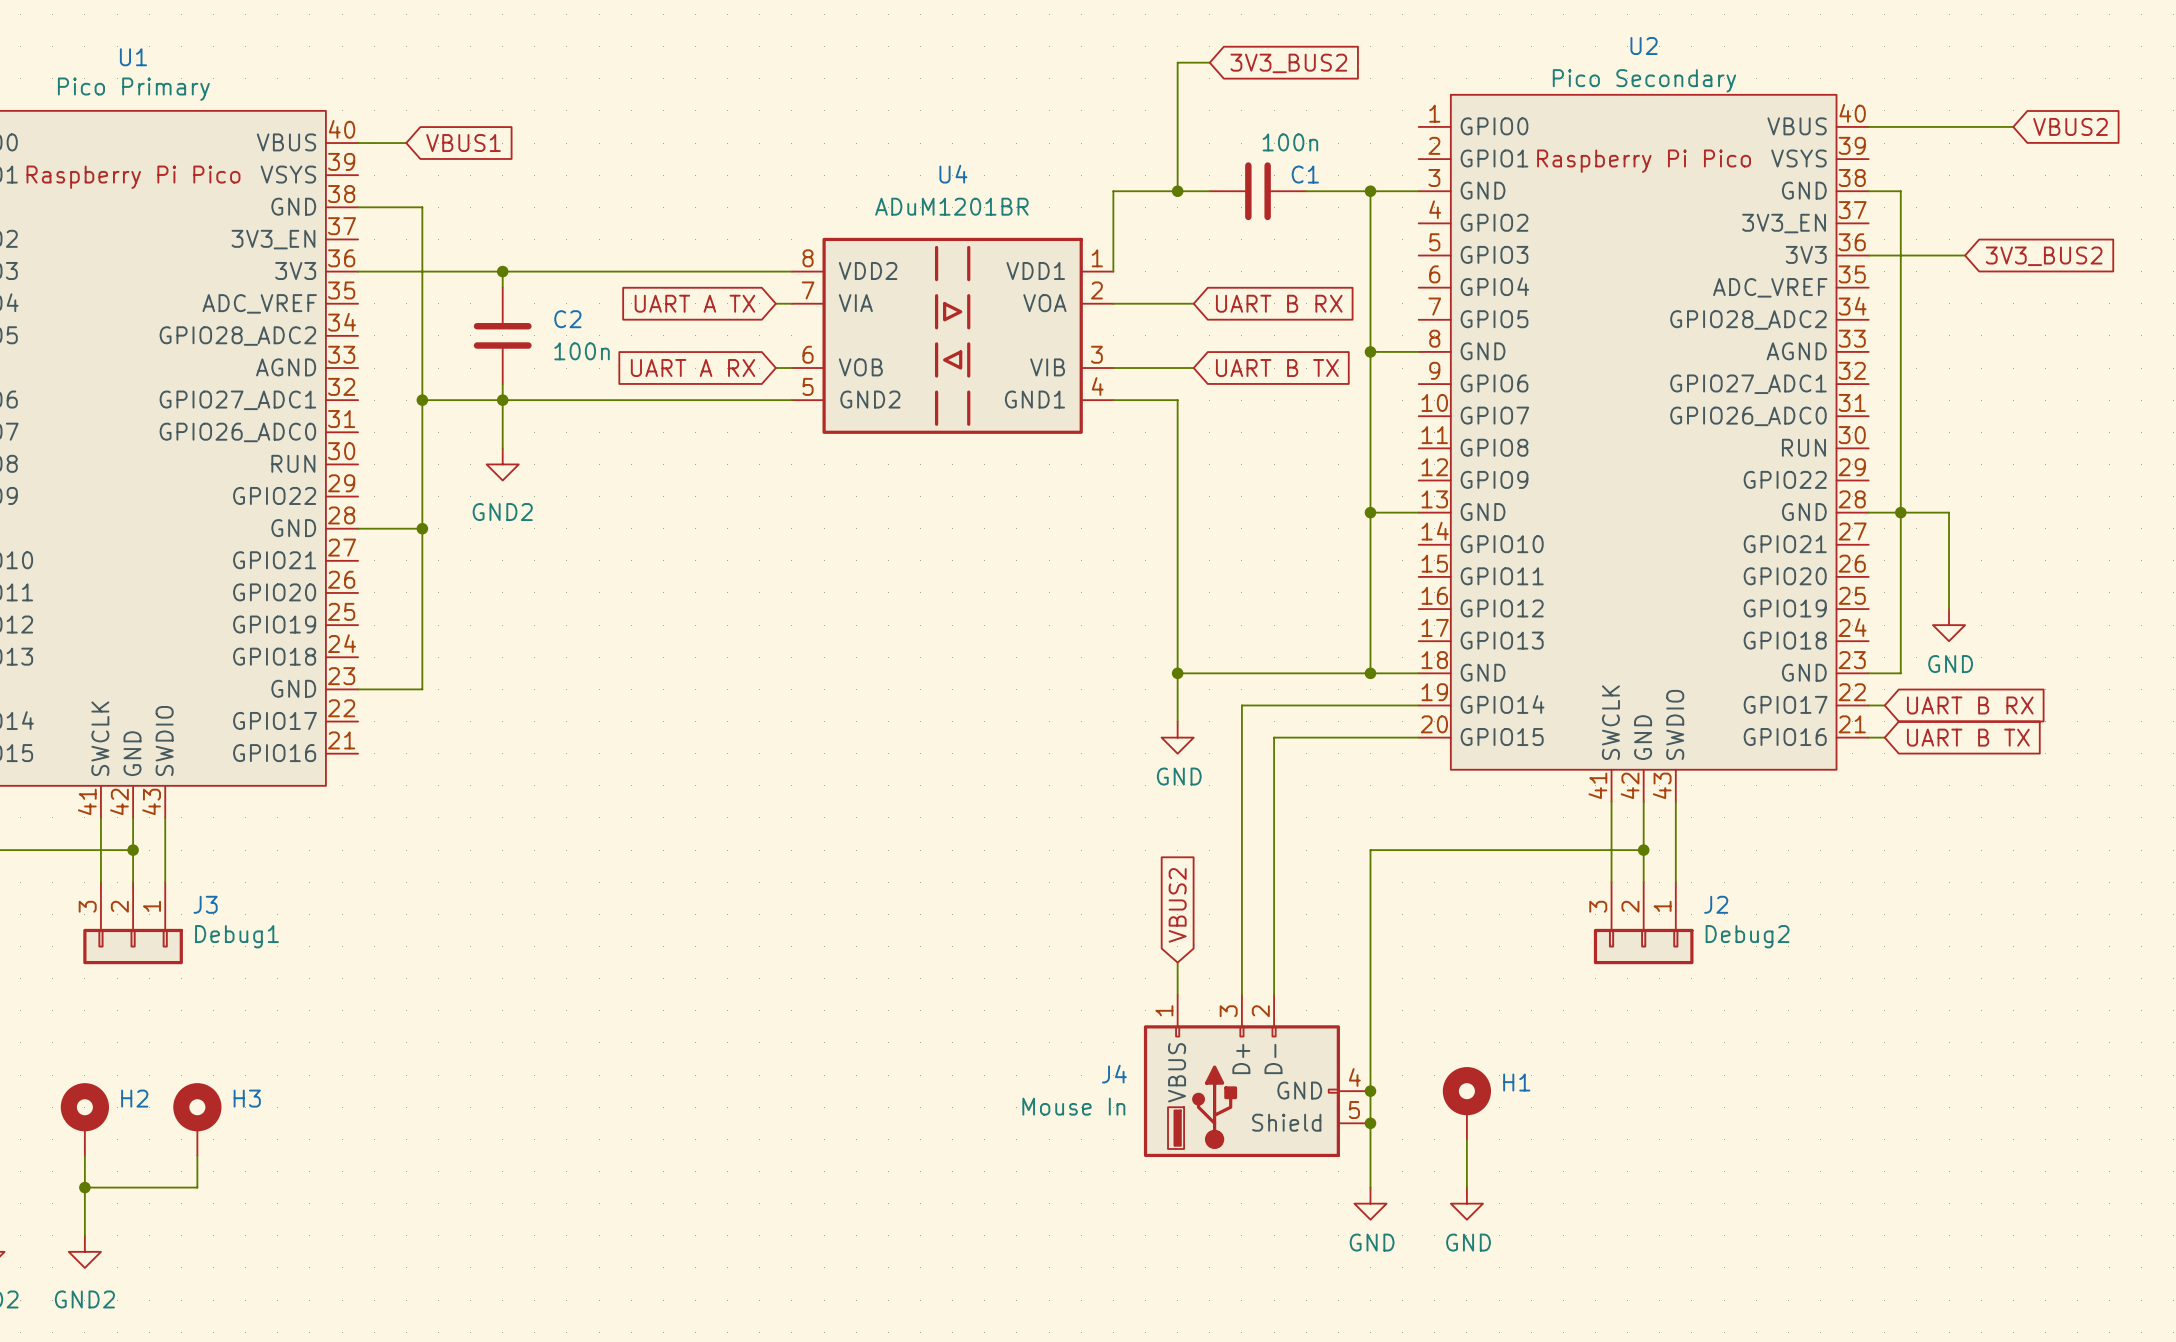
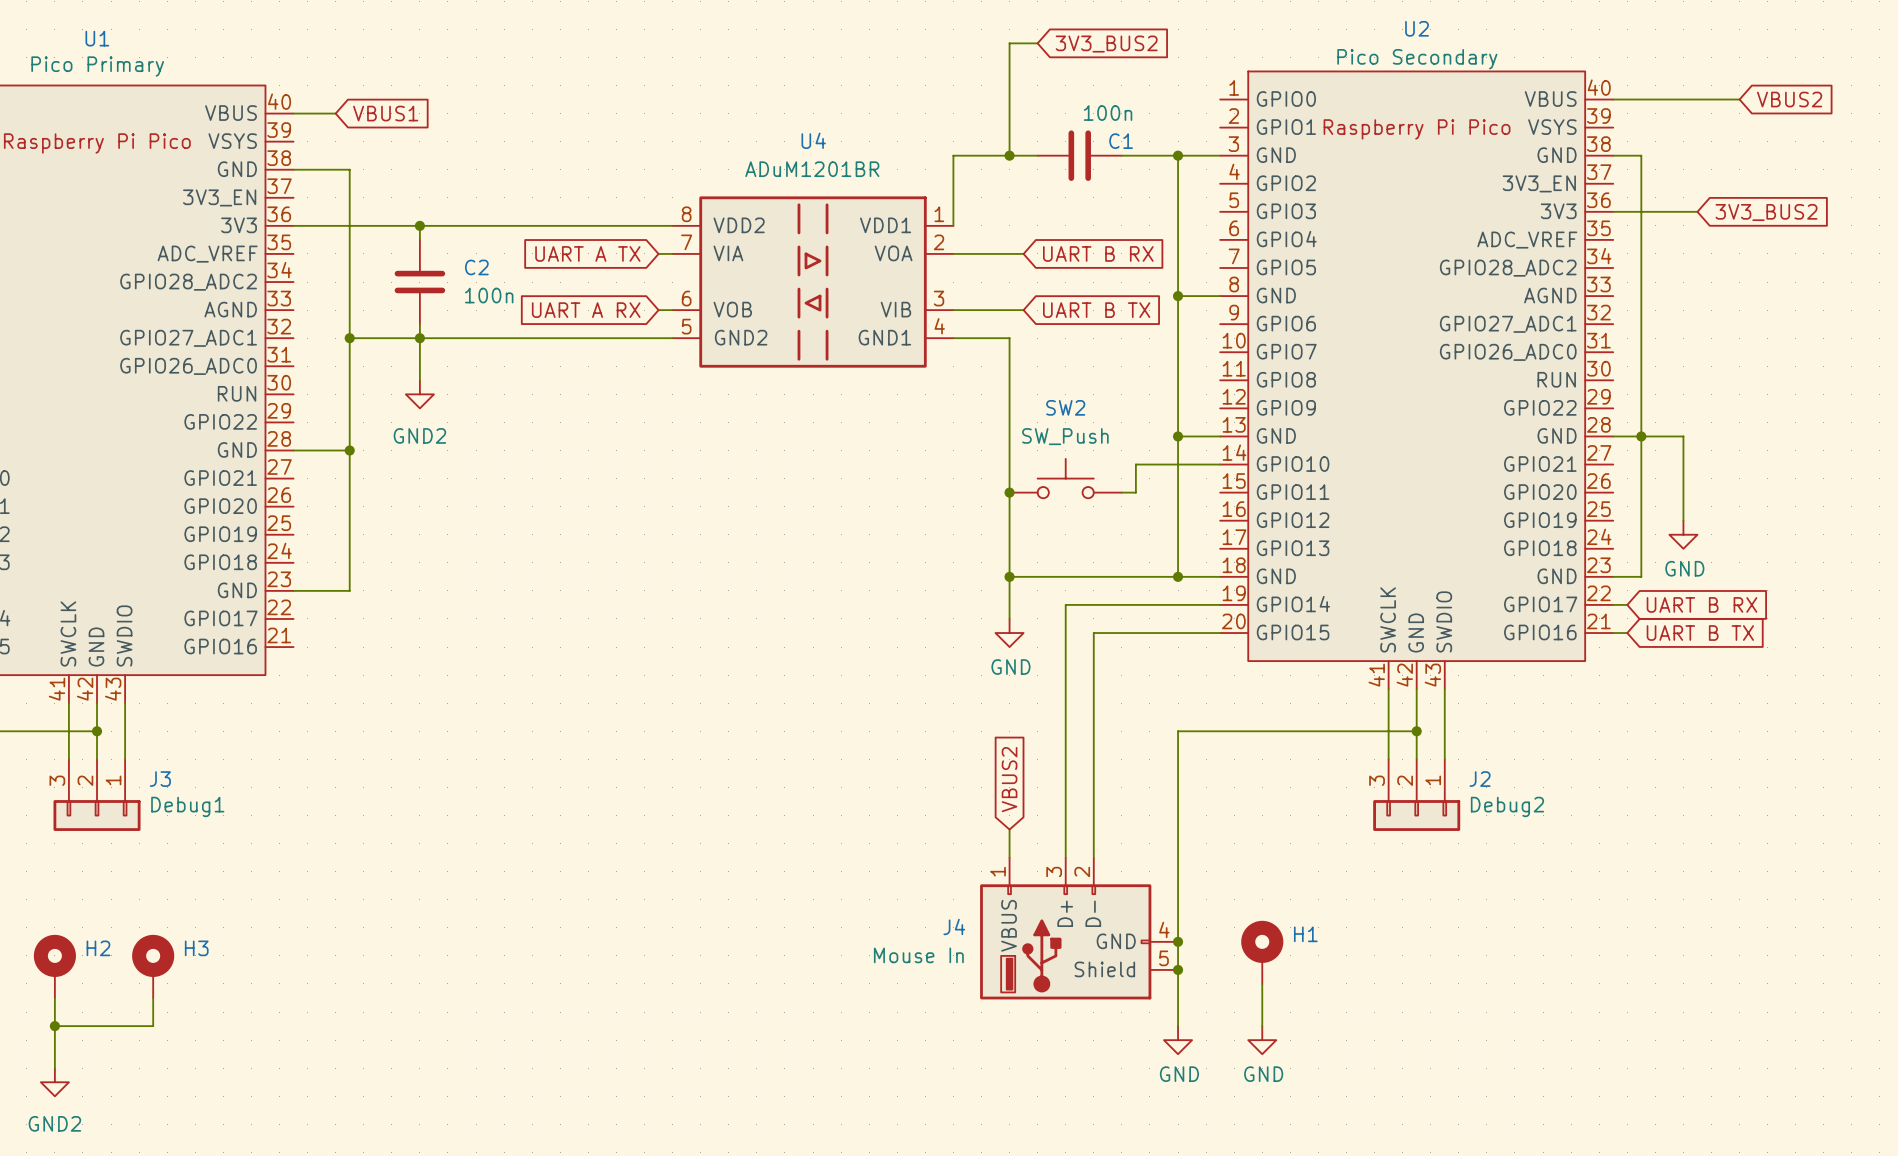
wire: none -> (1220, 464) (1135, 464) (1135, 492) (1121, 492)
SW2: none -> SW_Push (1065, 478)
junction: none -> (1009, 492)

